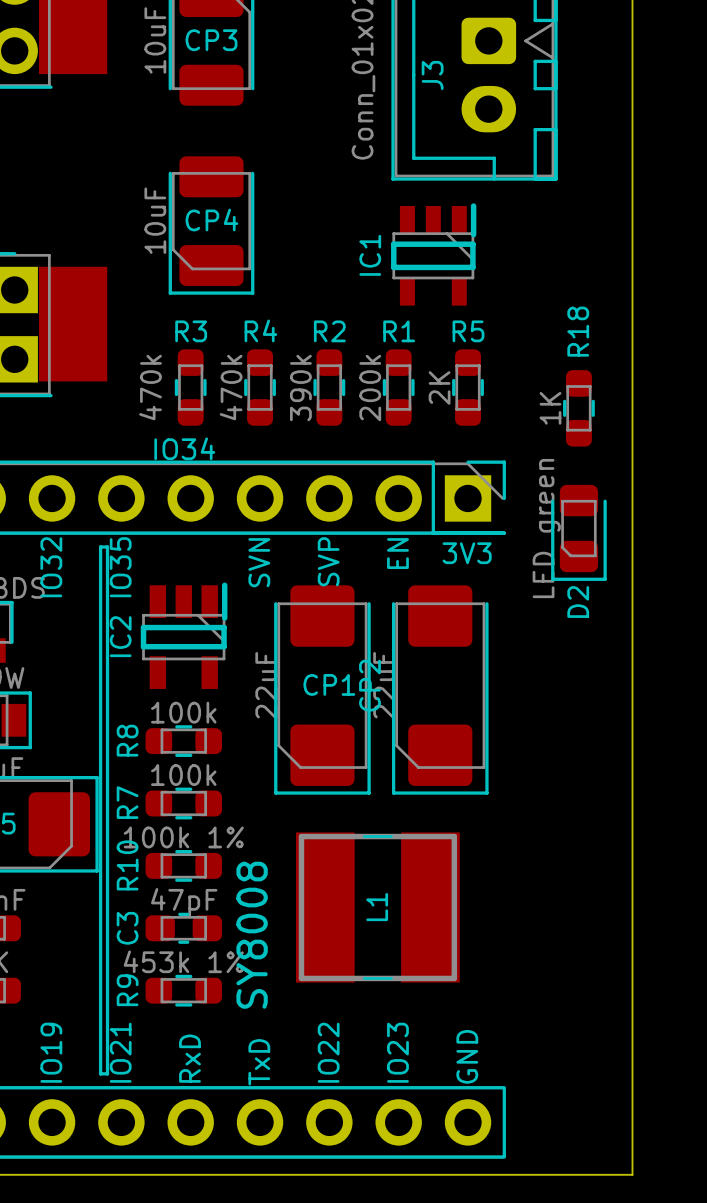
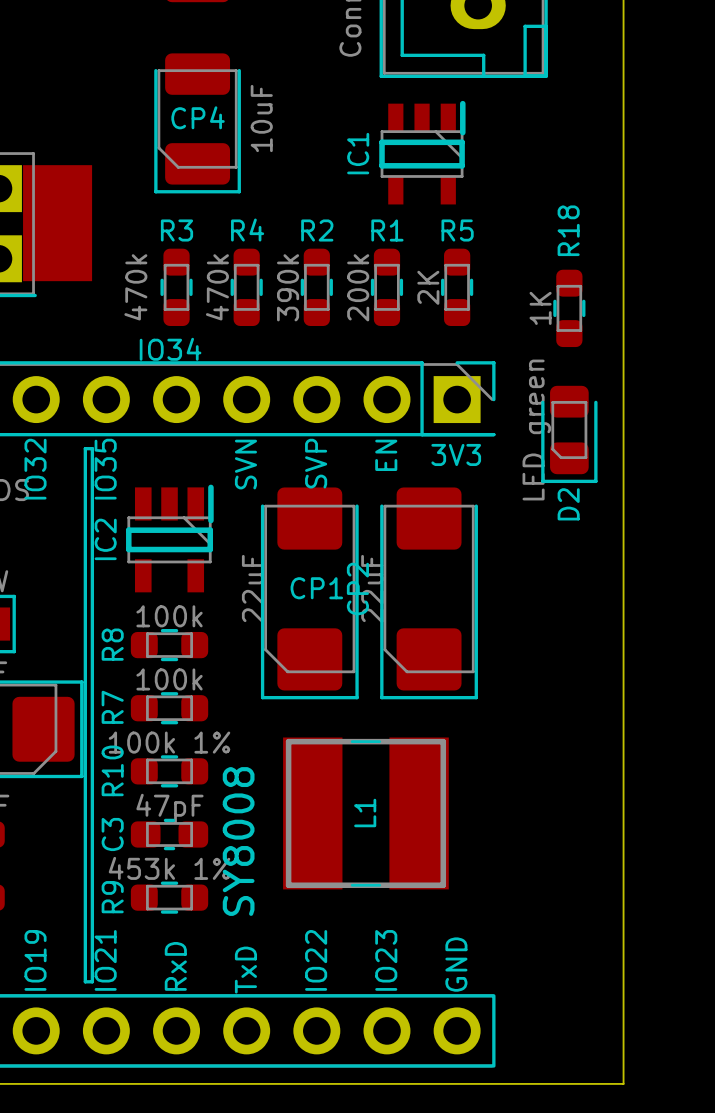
CP4 value position: 10uF (155, 220) -> 10uF (261, 118)

